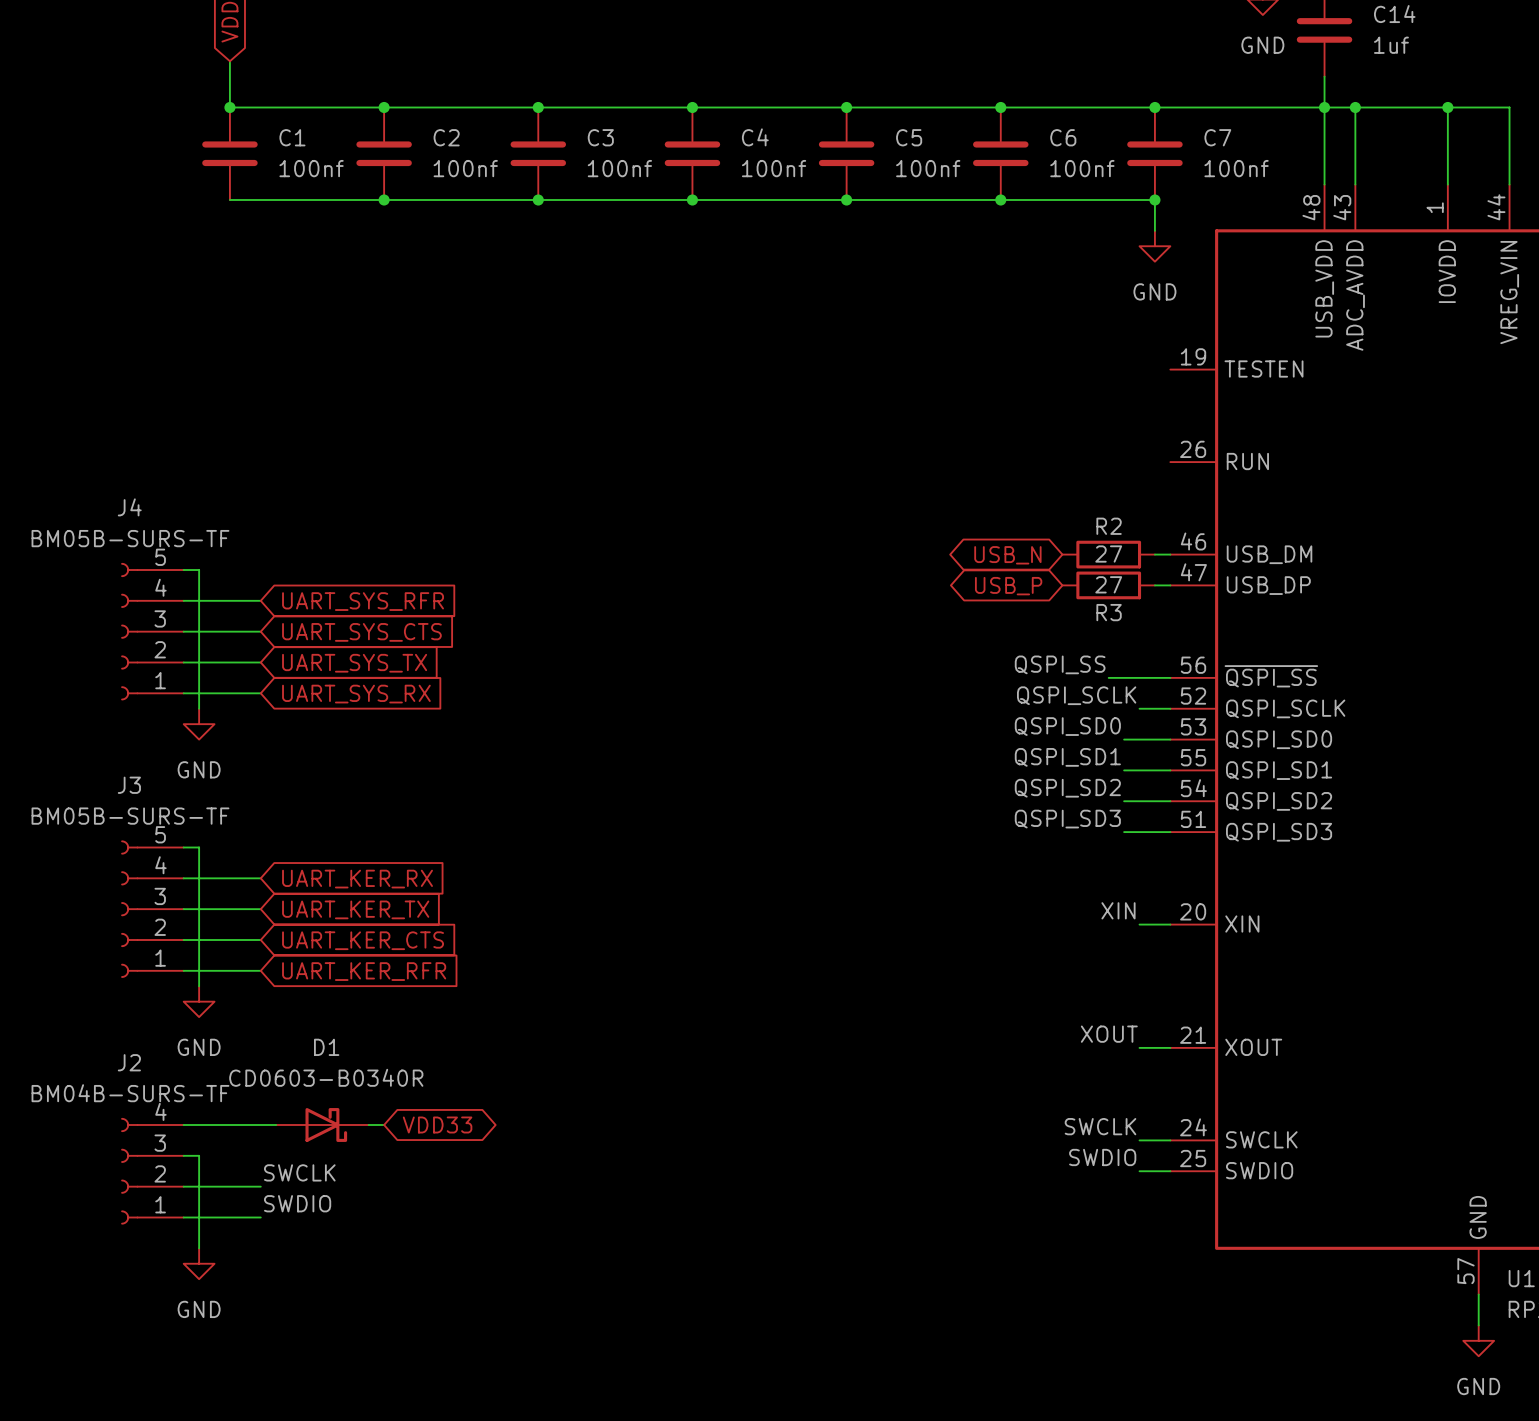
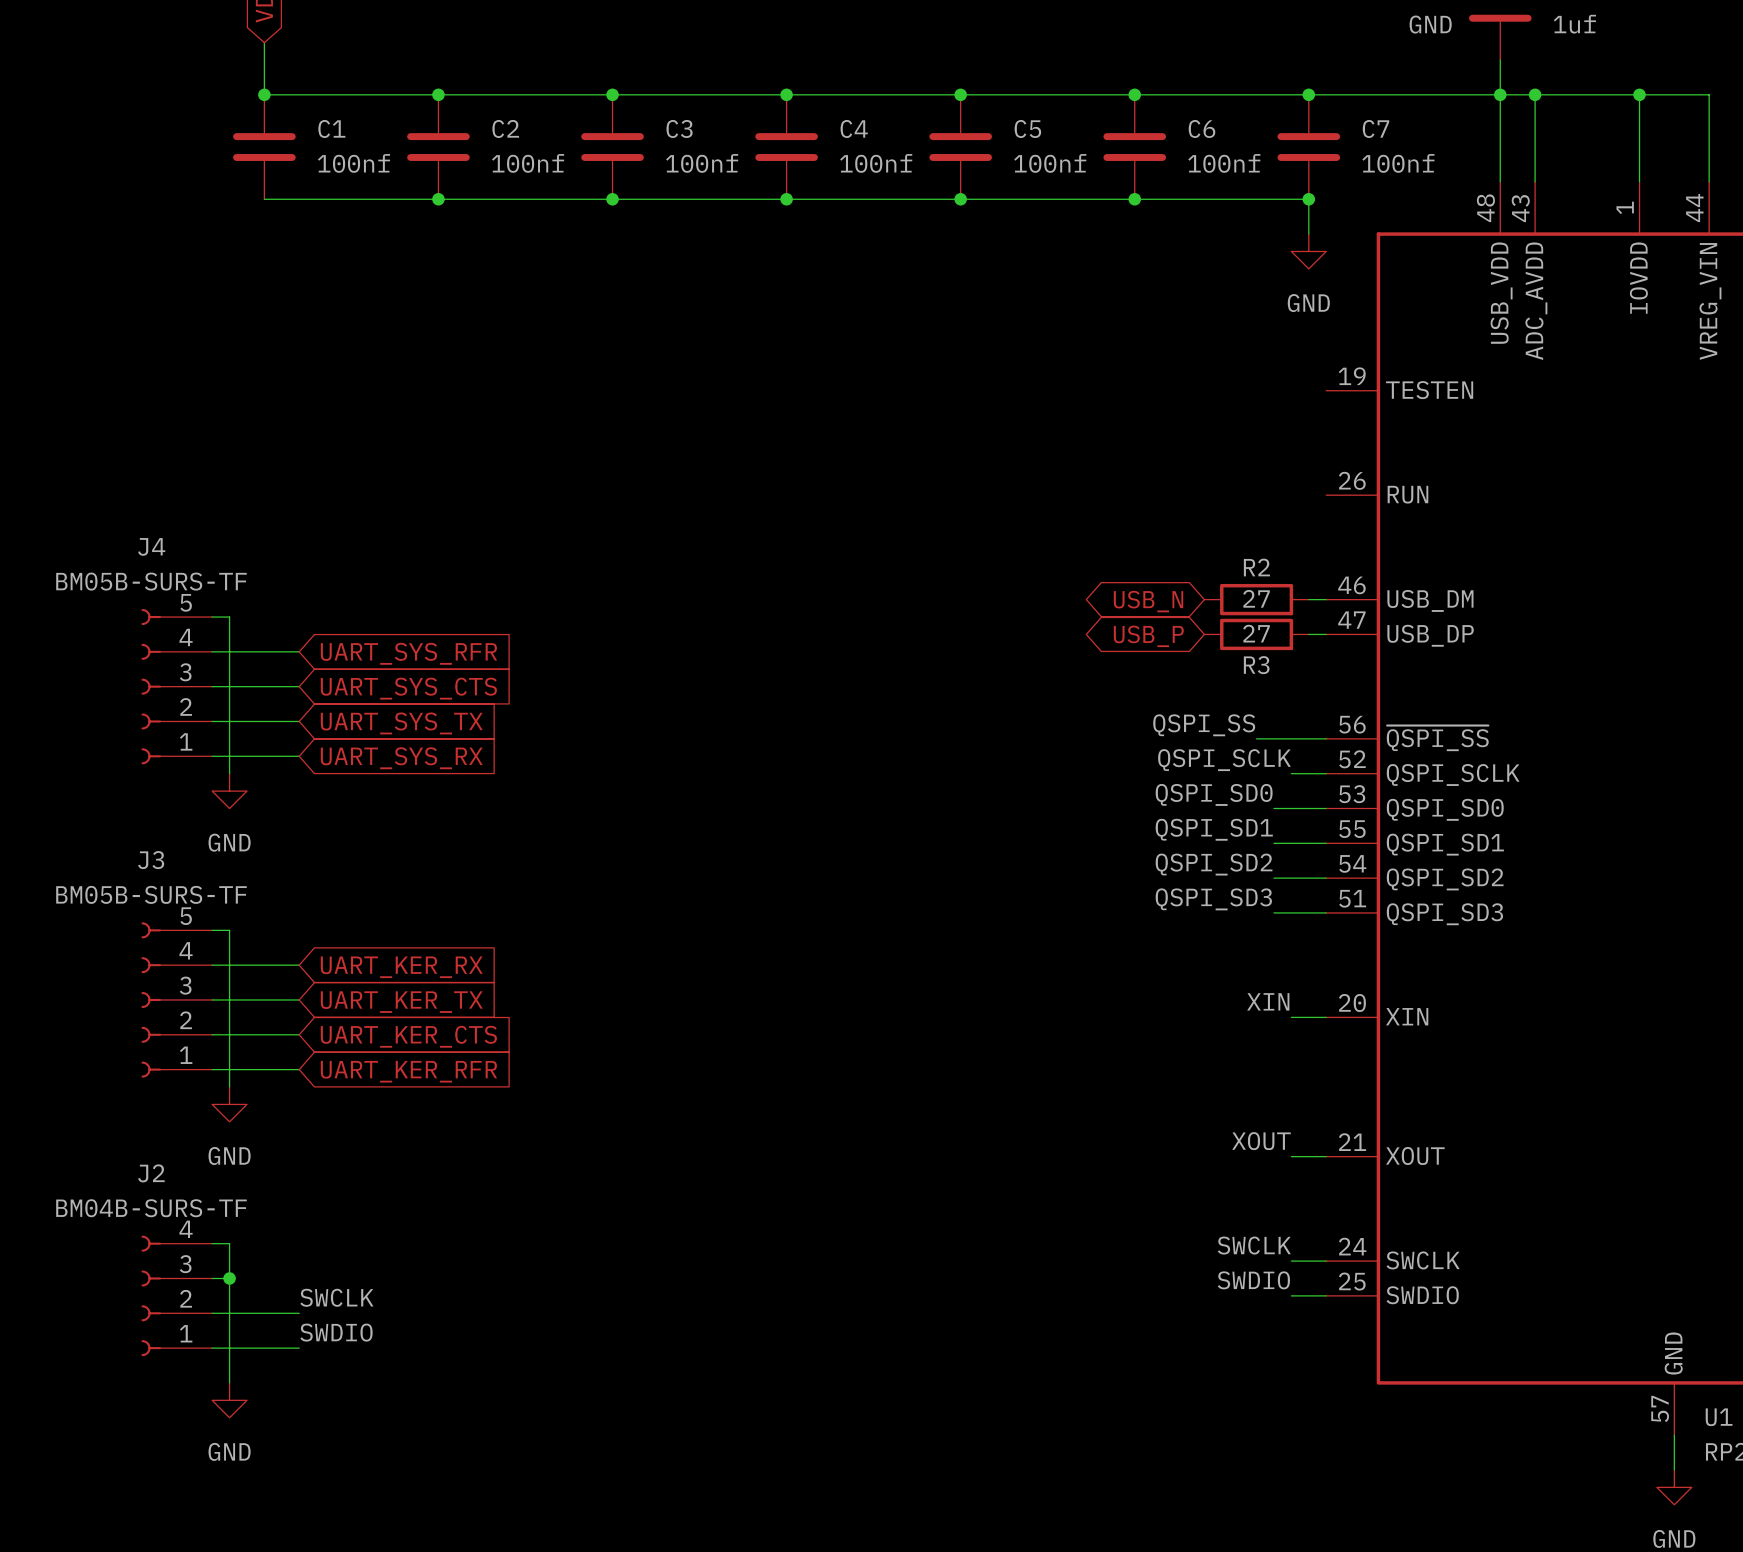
wire: (199, 1124) (276, 1124) -> (229, 1243) (229, 1278)
D1: CD0603-B0340R (322, 1124) -> none
wire: (368, 1124) (384, 1124) -> none
global label: VDD33 (437, 1124) -> none
junction: none -> (229, 1278)

